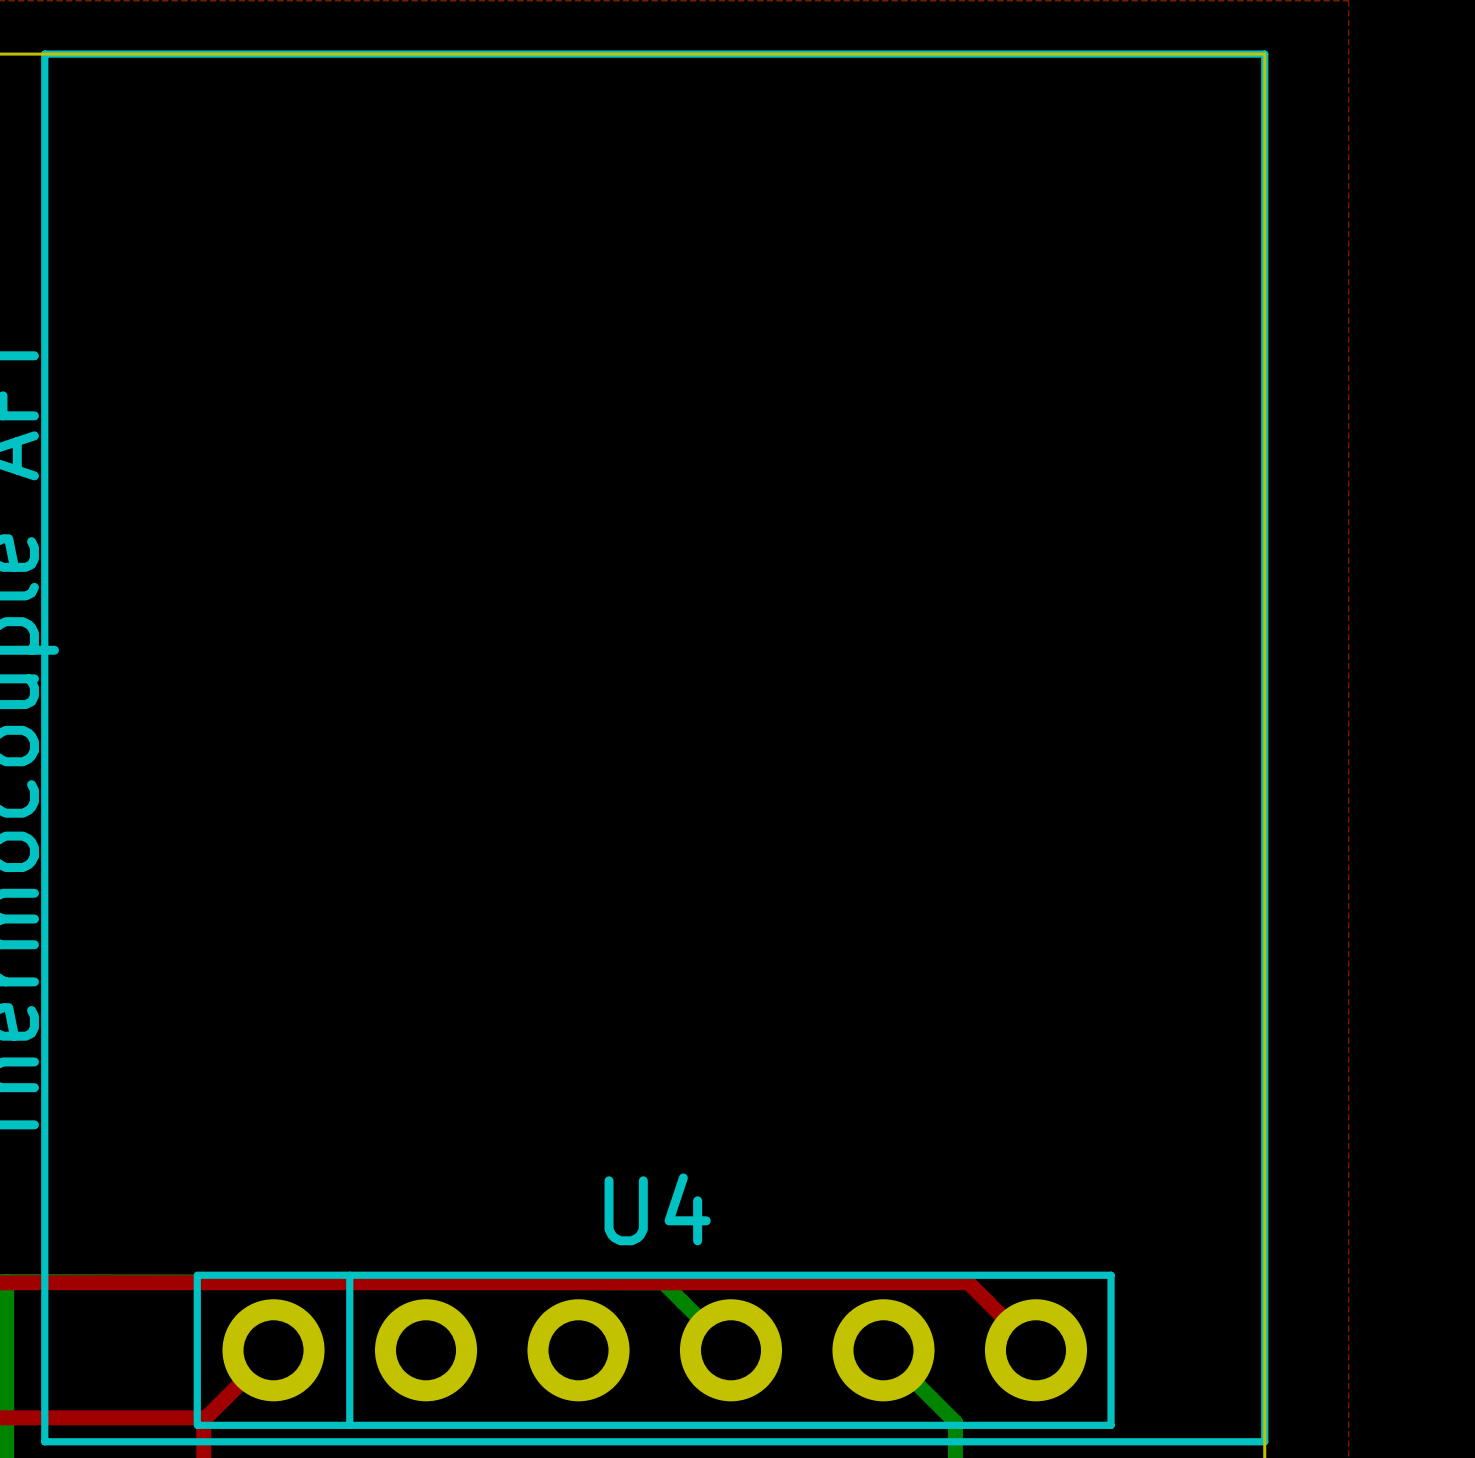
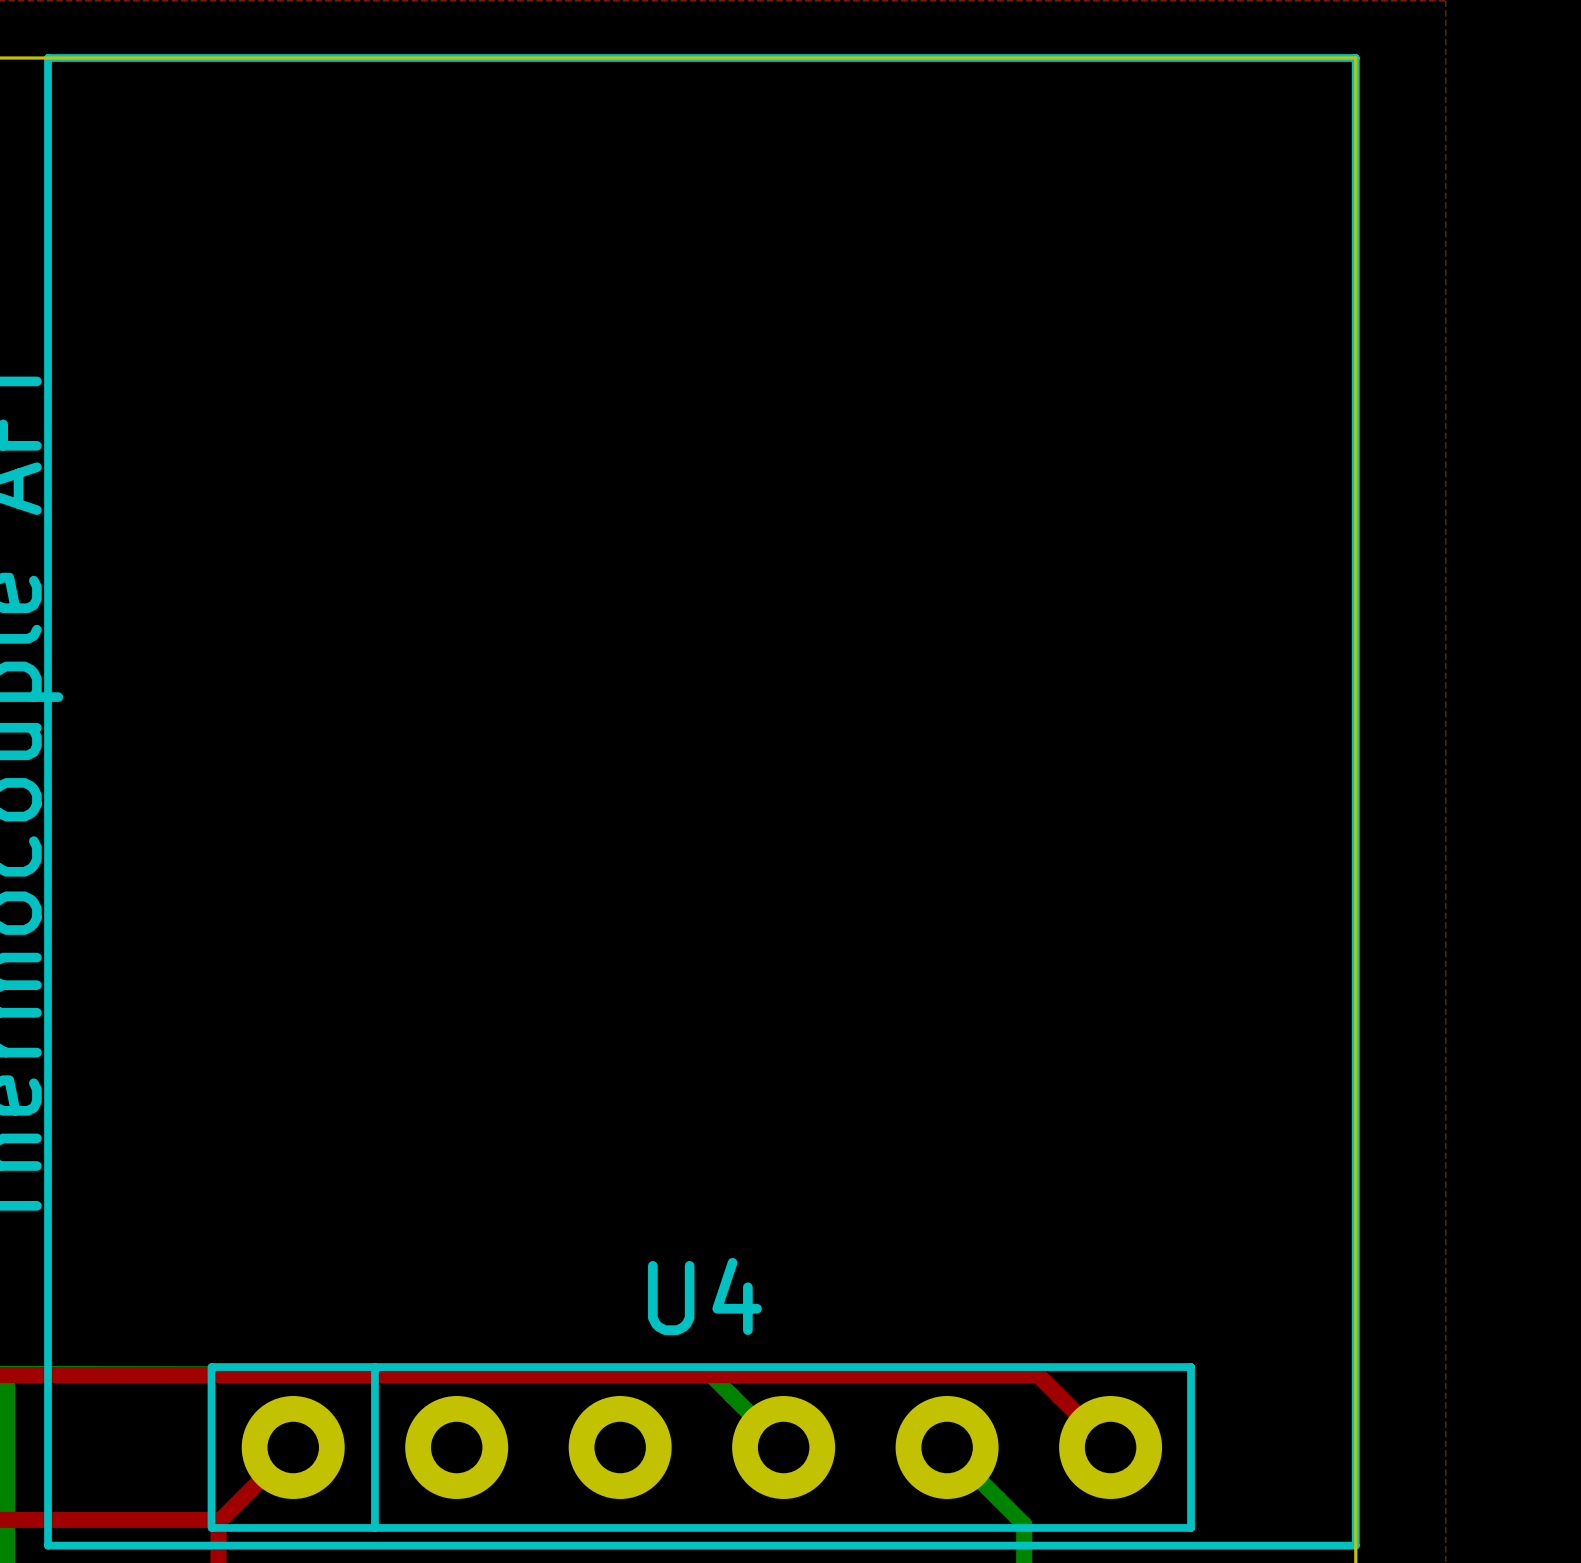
U4 footprint: [41, 50, 1269, 1446] -> [44, 54, 1360, 1550]

